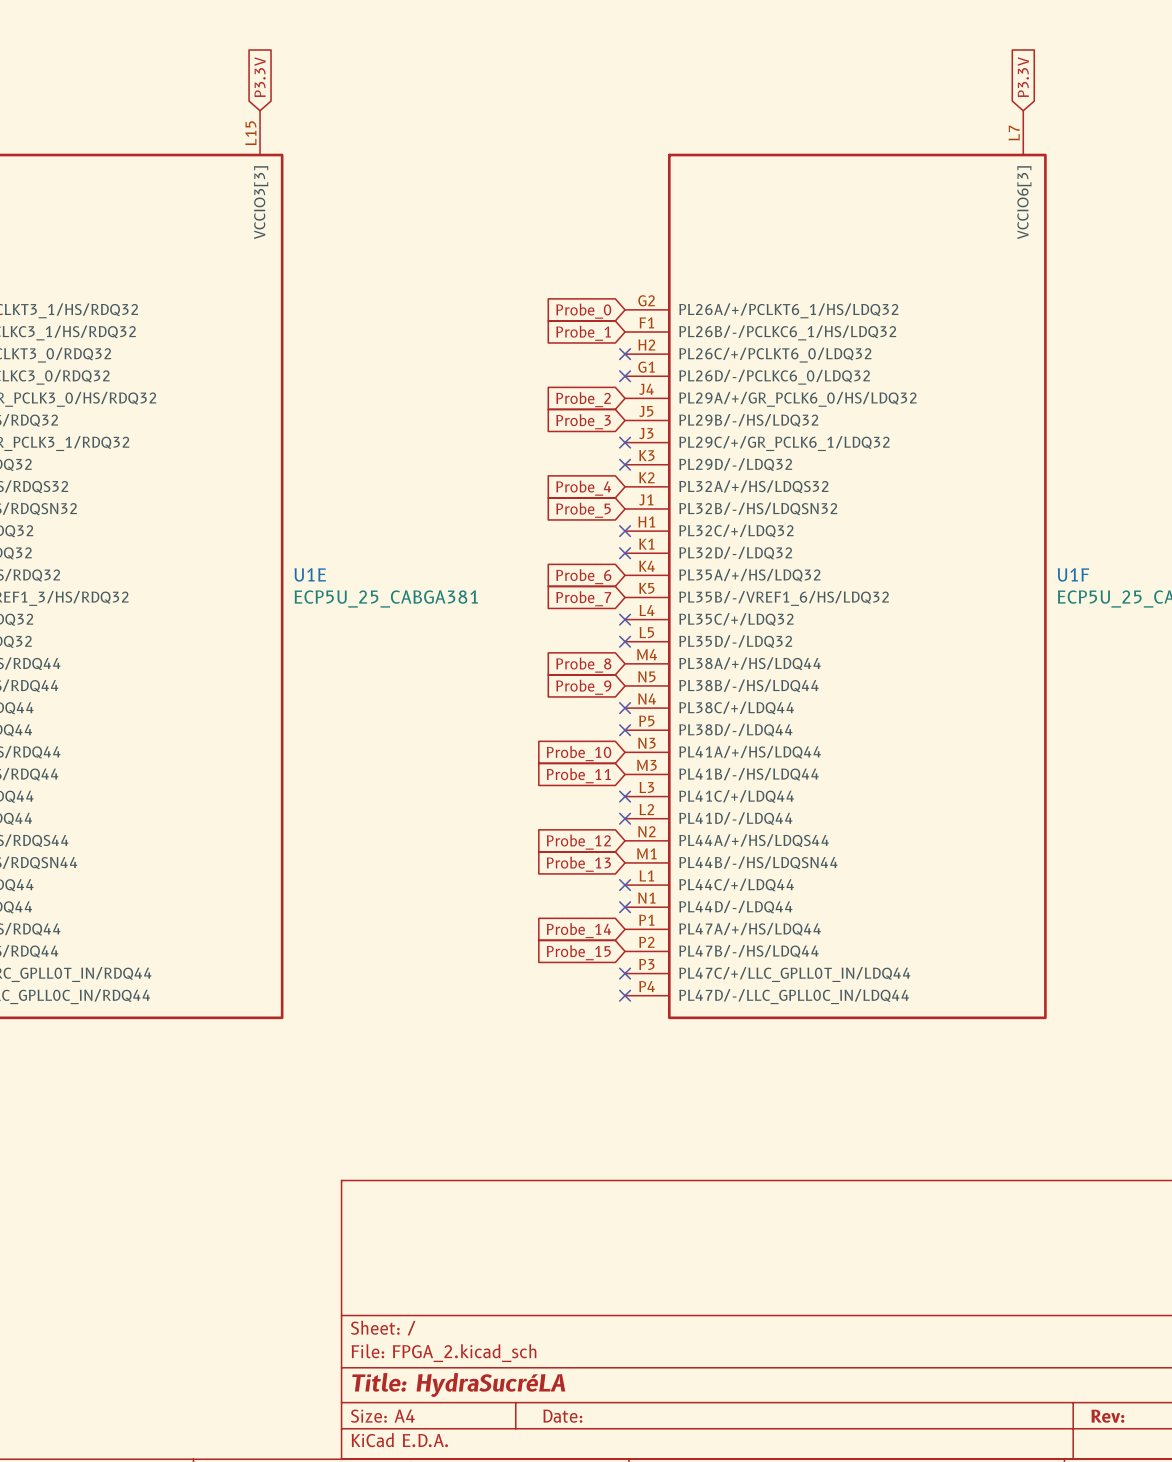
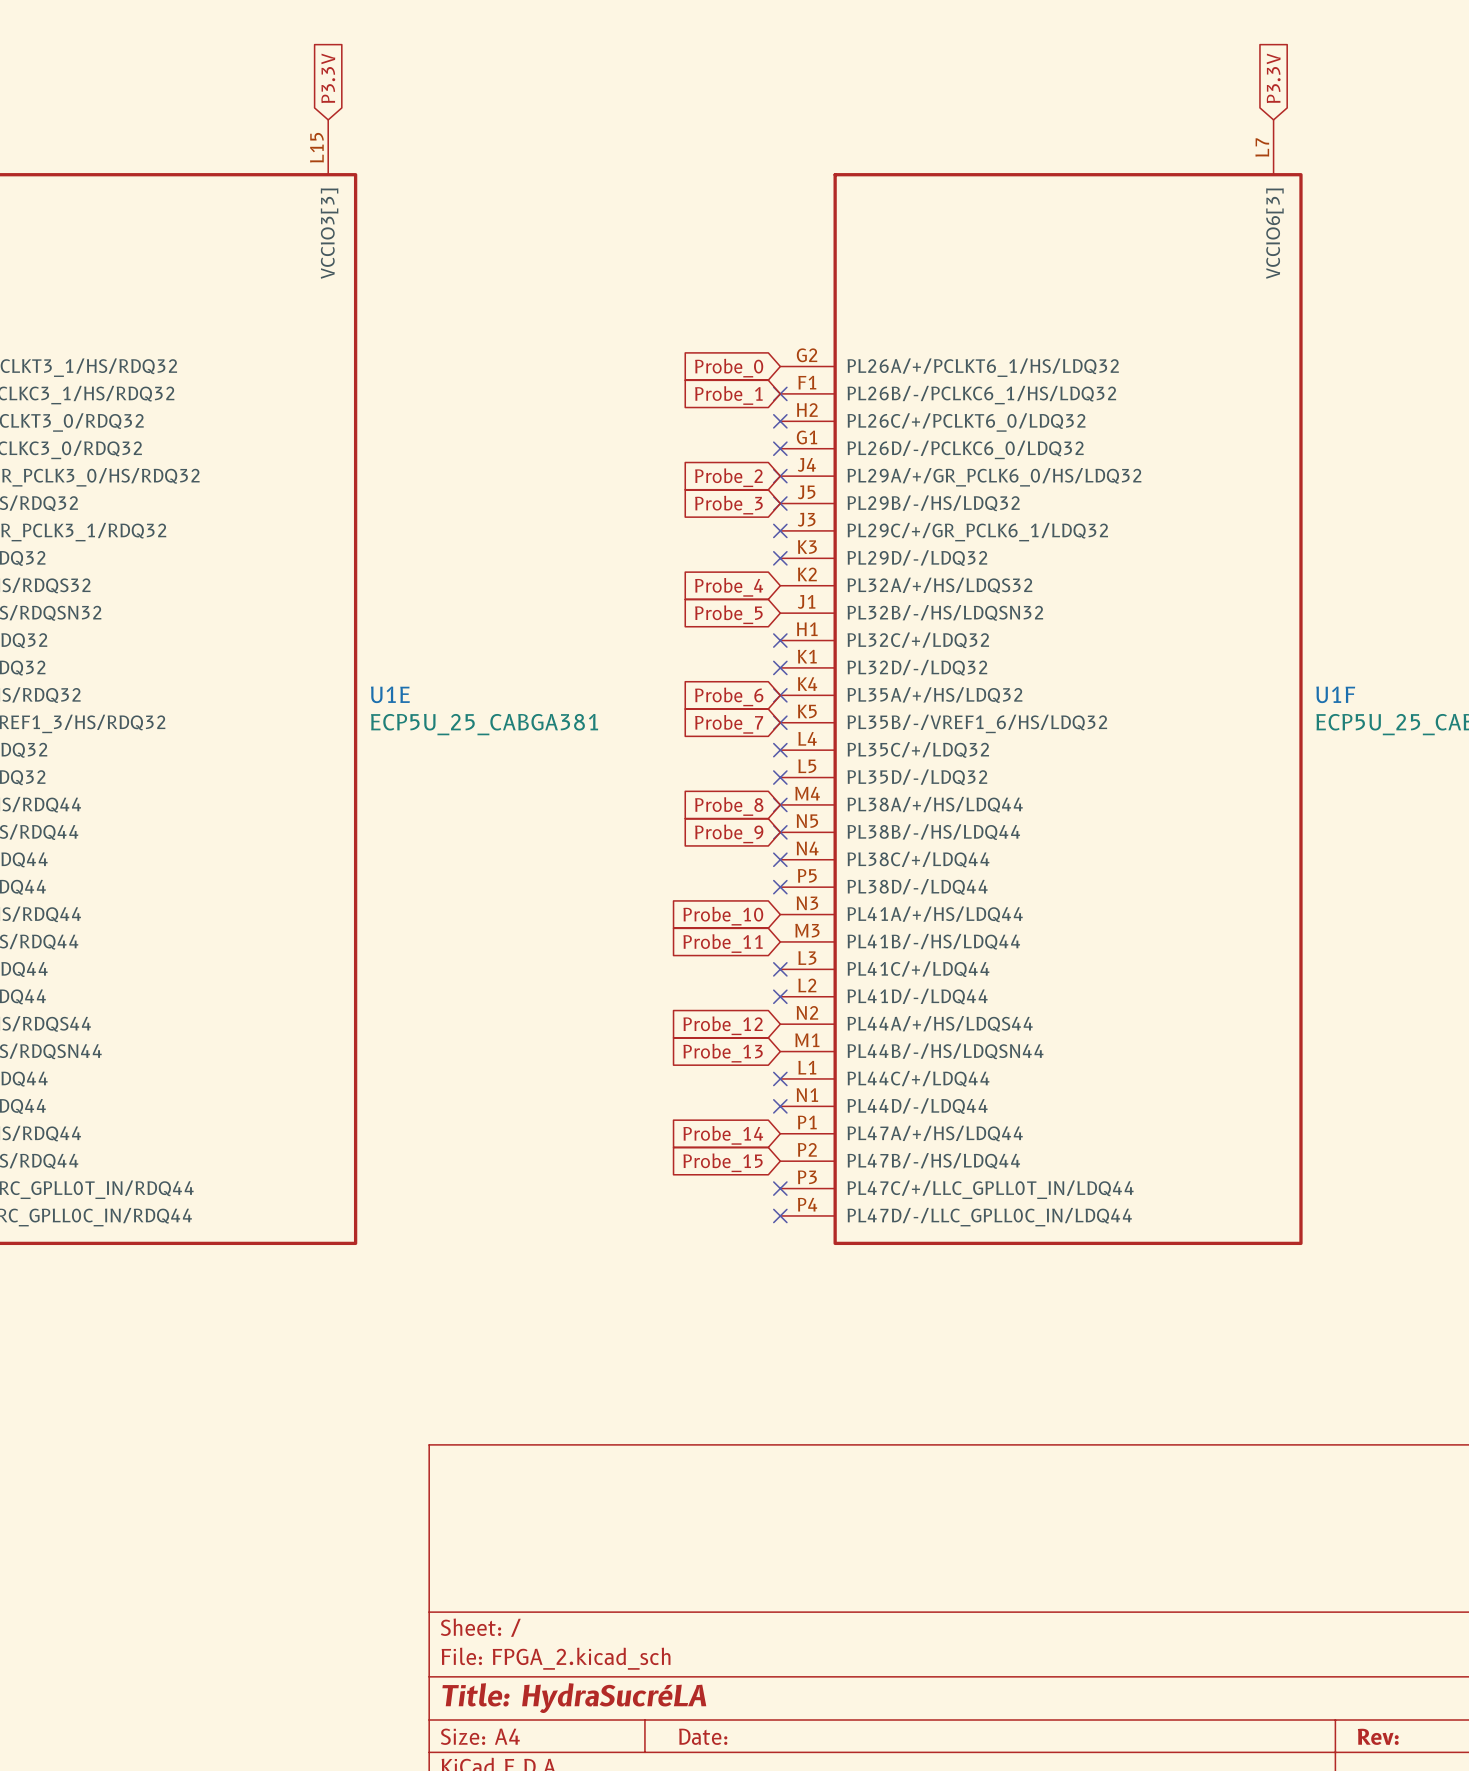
no-connect mark: none -> (780, 393)
no-connect mark: none -> (780, 476)
no-connect mark: none -> (780, 503)
no-connect mark: none -> (780, 695)
no-connect mark: none -> (780, 722)
no-connect mark: none -> (780, 804)
no-connect mark: none -> (780, 832)

